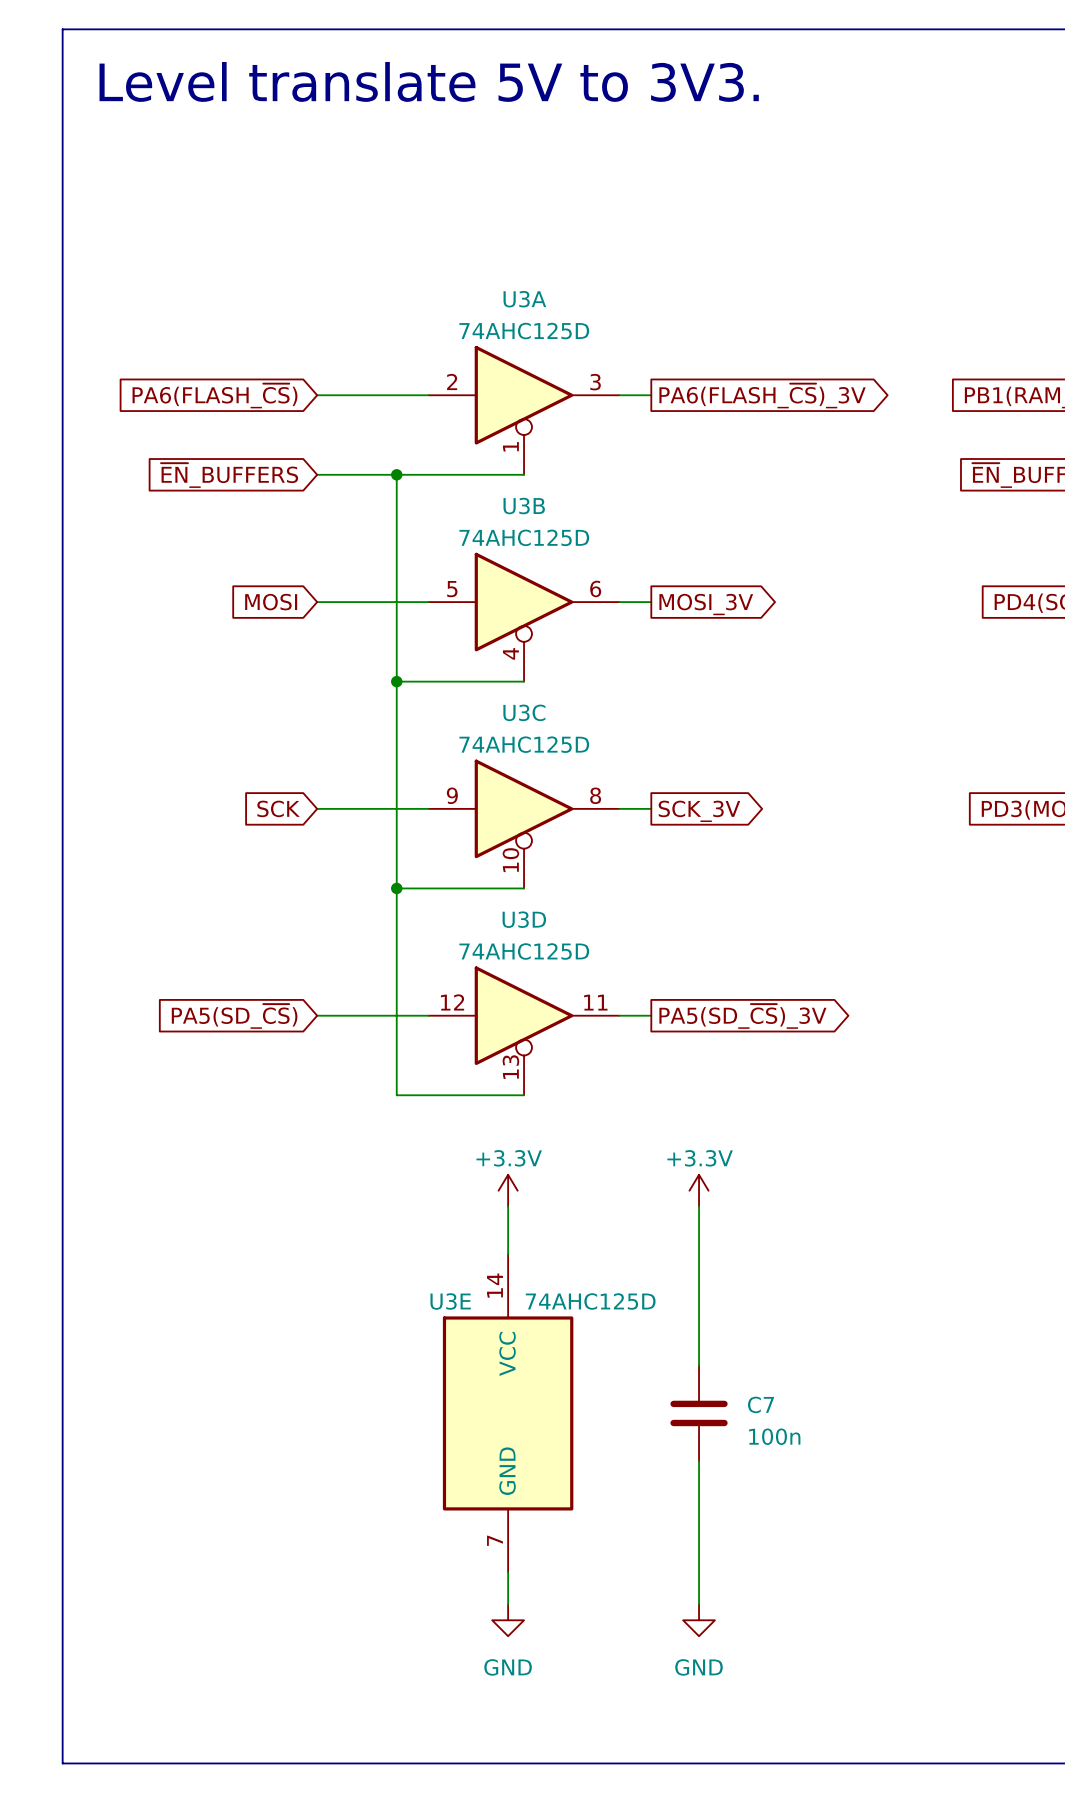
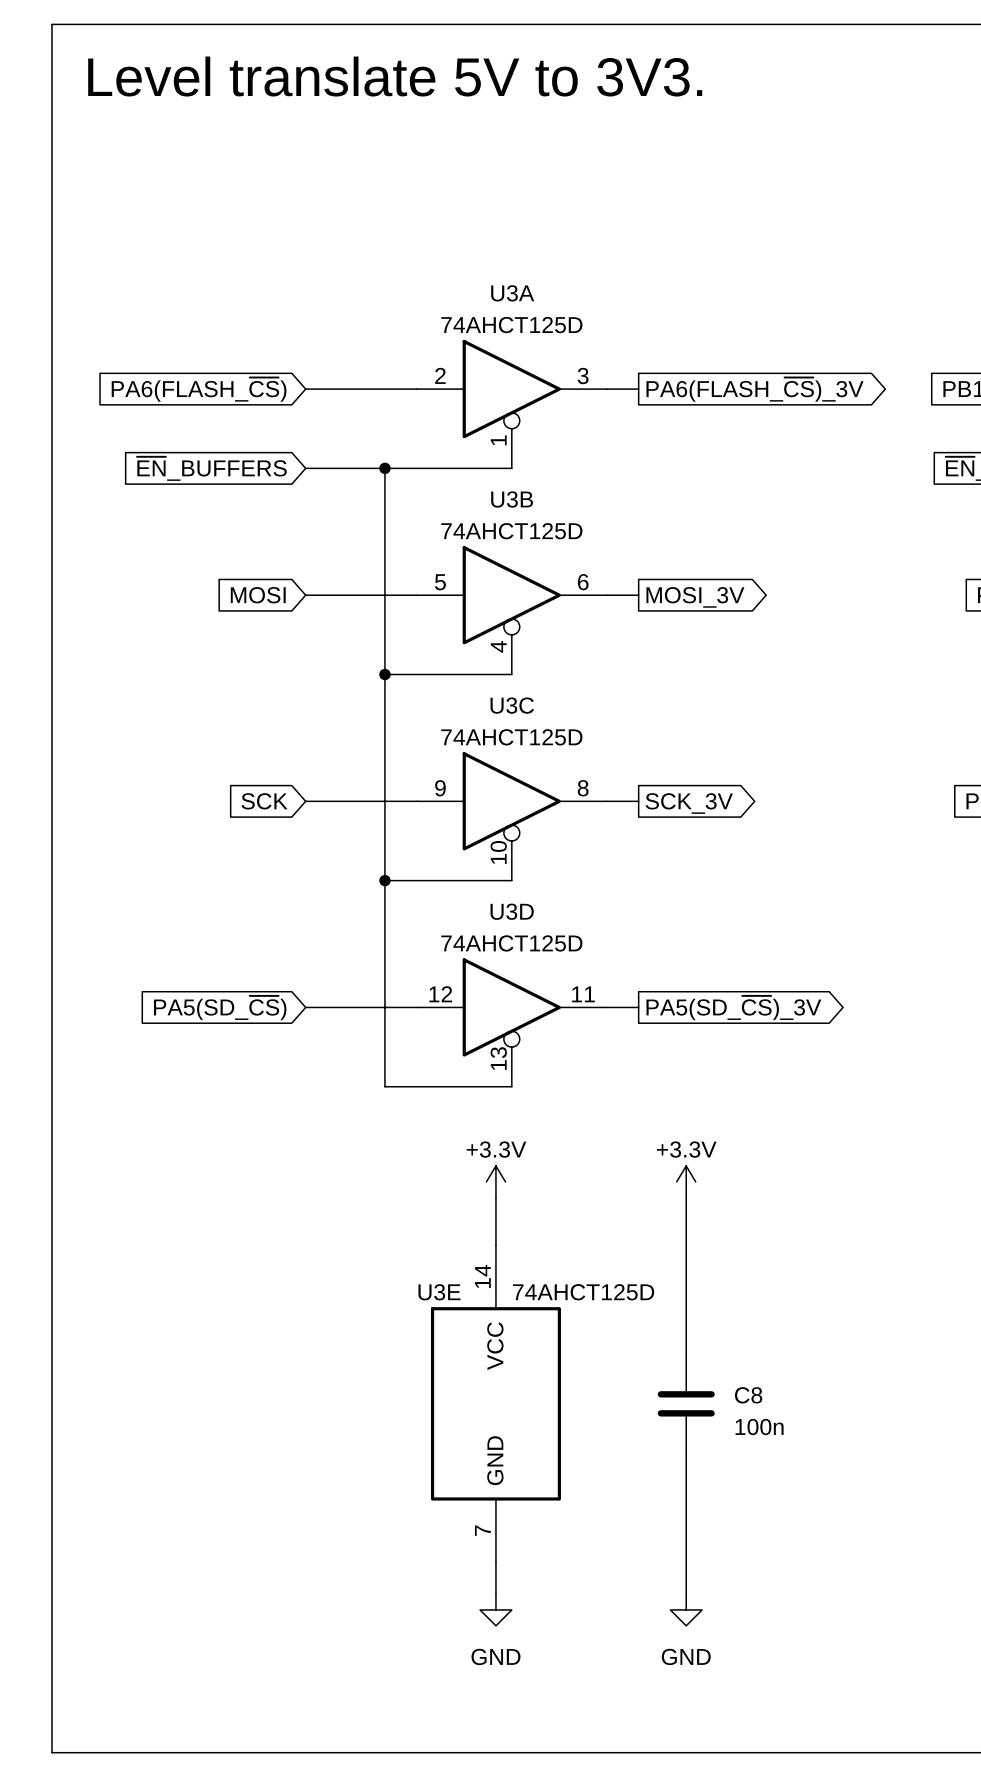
U3A value: 74AHC125D (524, 331) -> 74AHCT125D (511, 325)
U3B value: 74AHC125D (524, 537) -> 74AHCT125D (511, 531)
U3C value: 74AHC125D (524, 744) -> 74AHCT125D (511, 737)
U3D value: 74AHC125D (524, 951) -> 74AHCT125D (511, 943)
U3E value: 74AHC125D (590, 1301) -> 74AHCT125D (583, 1292)
C7 name: C7 (760, 1404) -> C8 (748, 1395)

